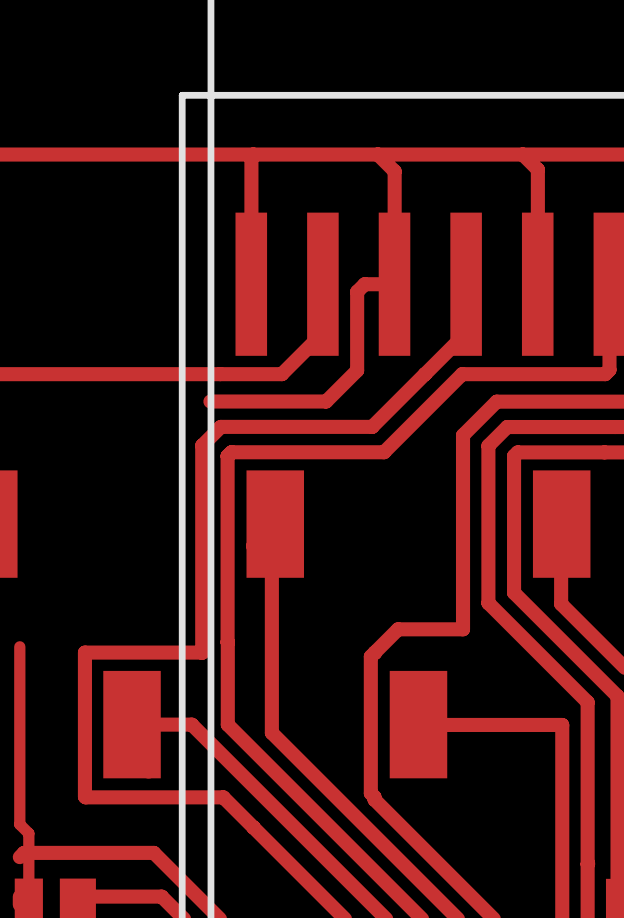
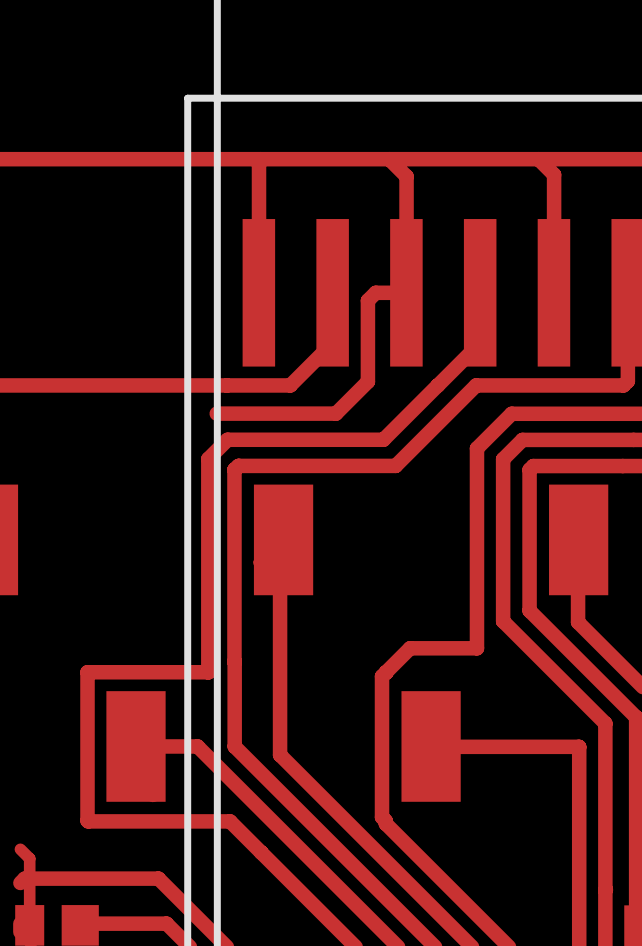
top track: (19, 646) (19, 824) -> none

